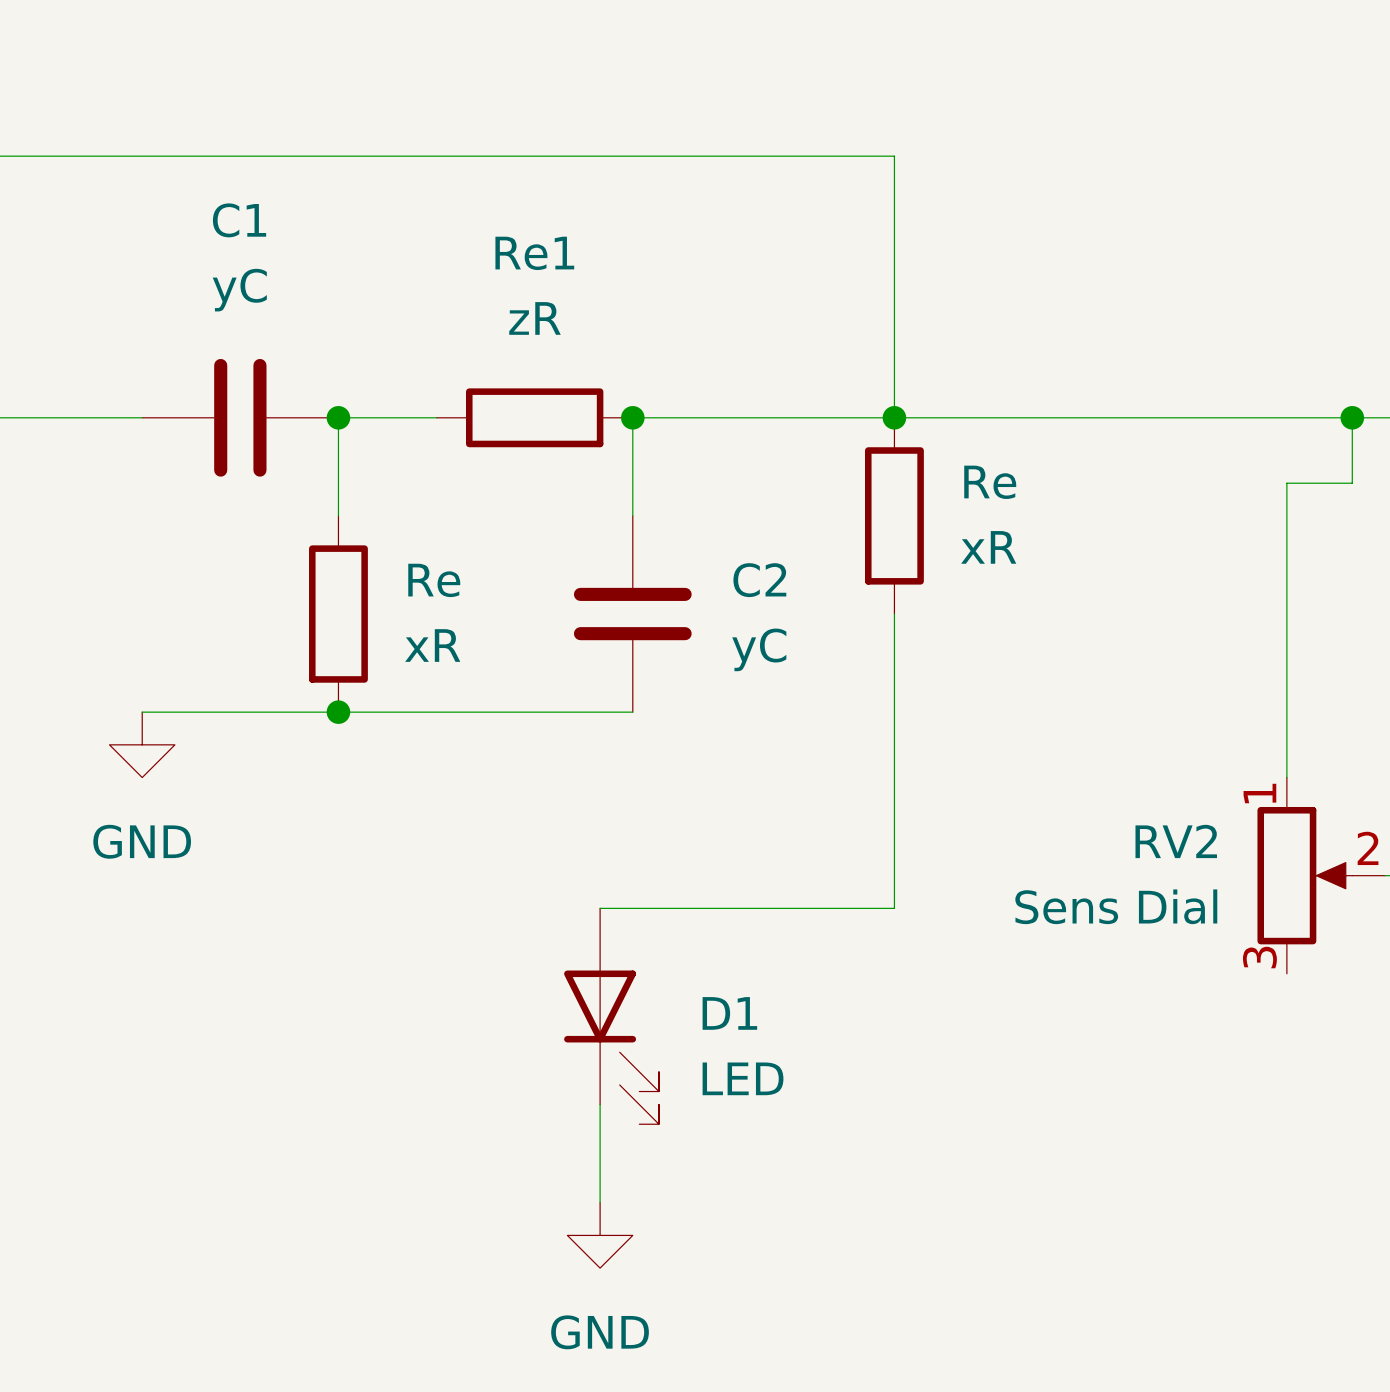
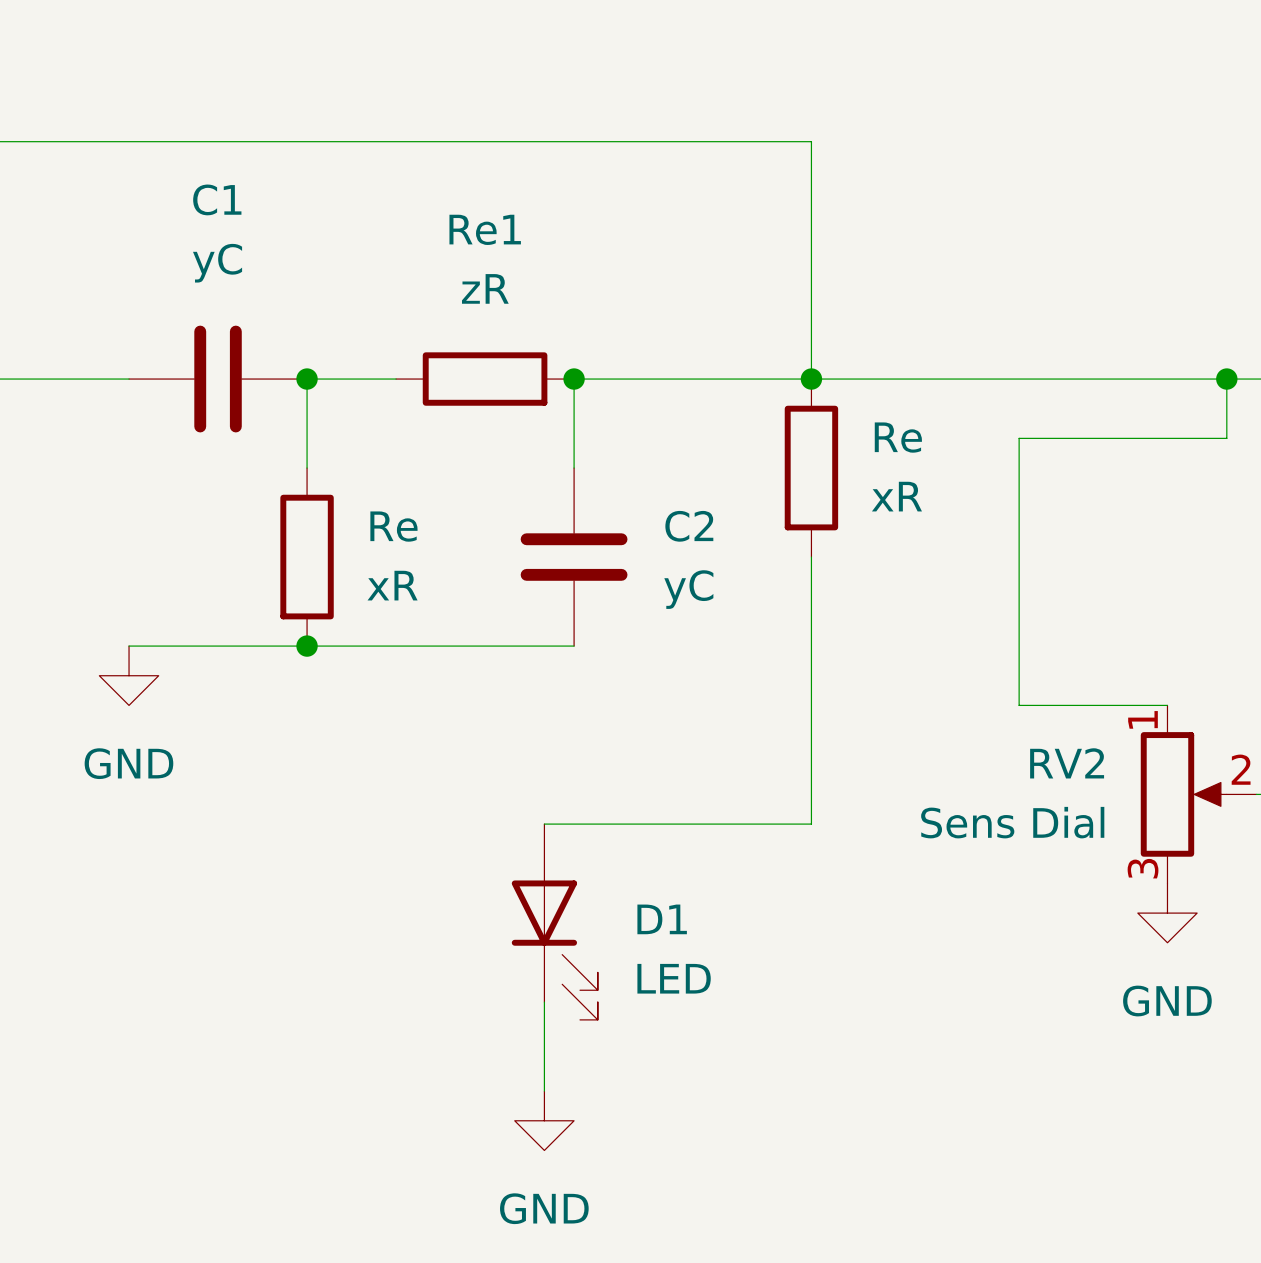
wire: (1286, 483) (1286, 777) -> (1167, 438) (1019, 438) (1019, 705) (1167, 705)
power symbol: none -> GND (1167, 913)

